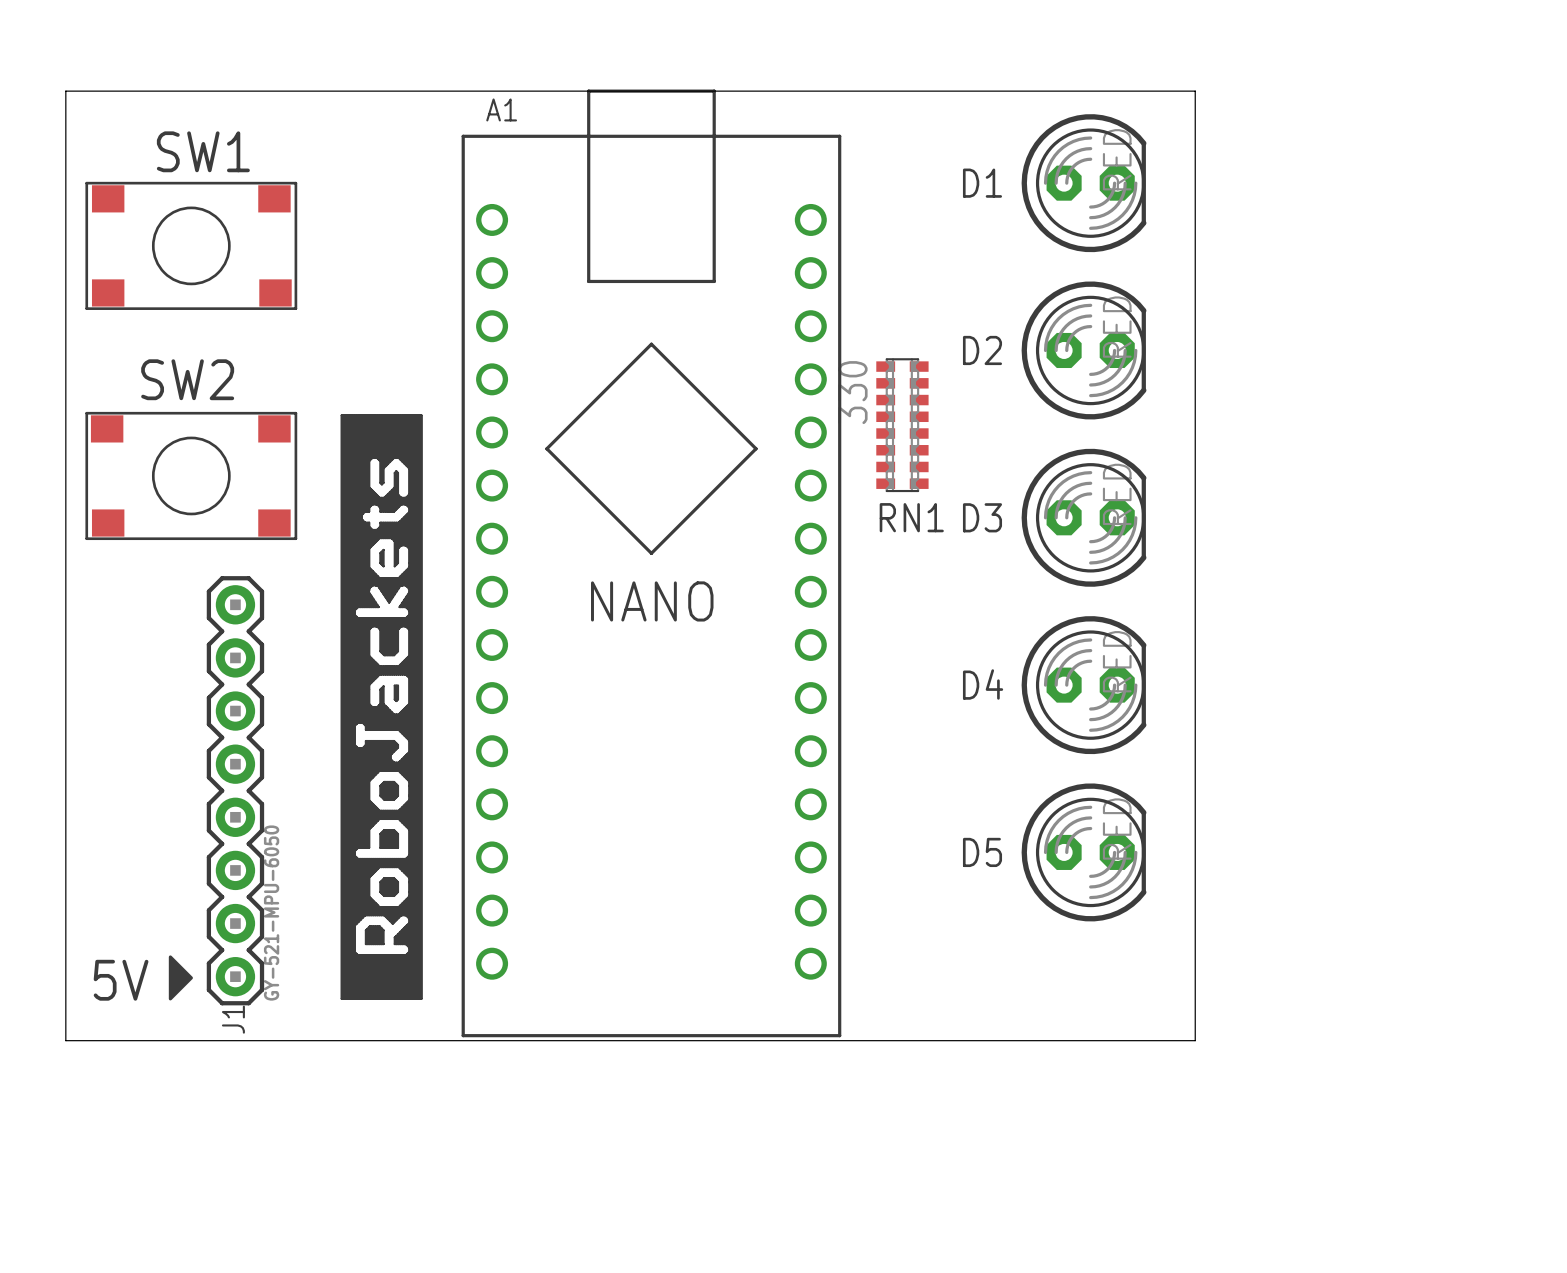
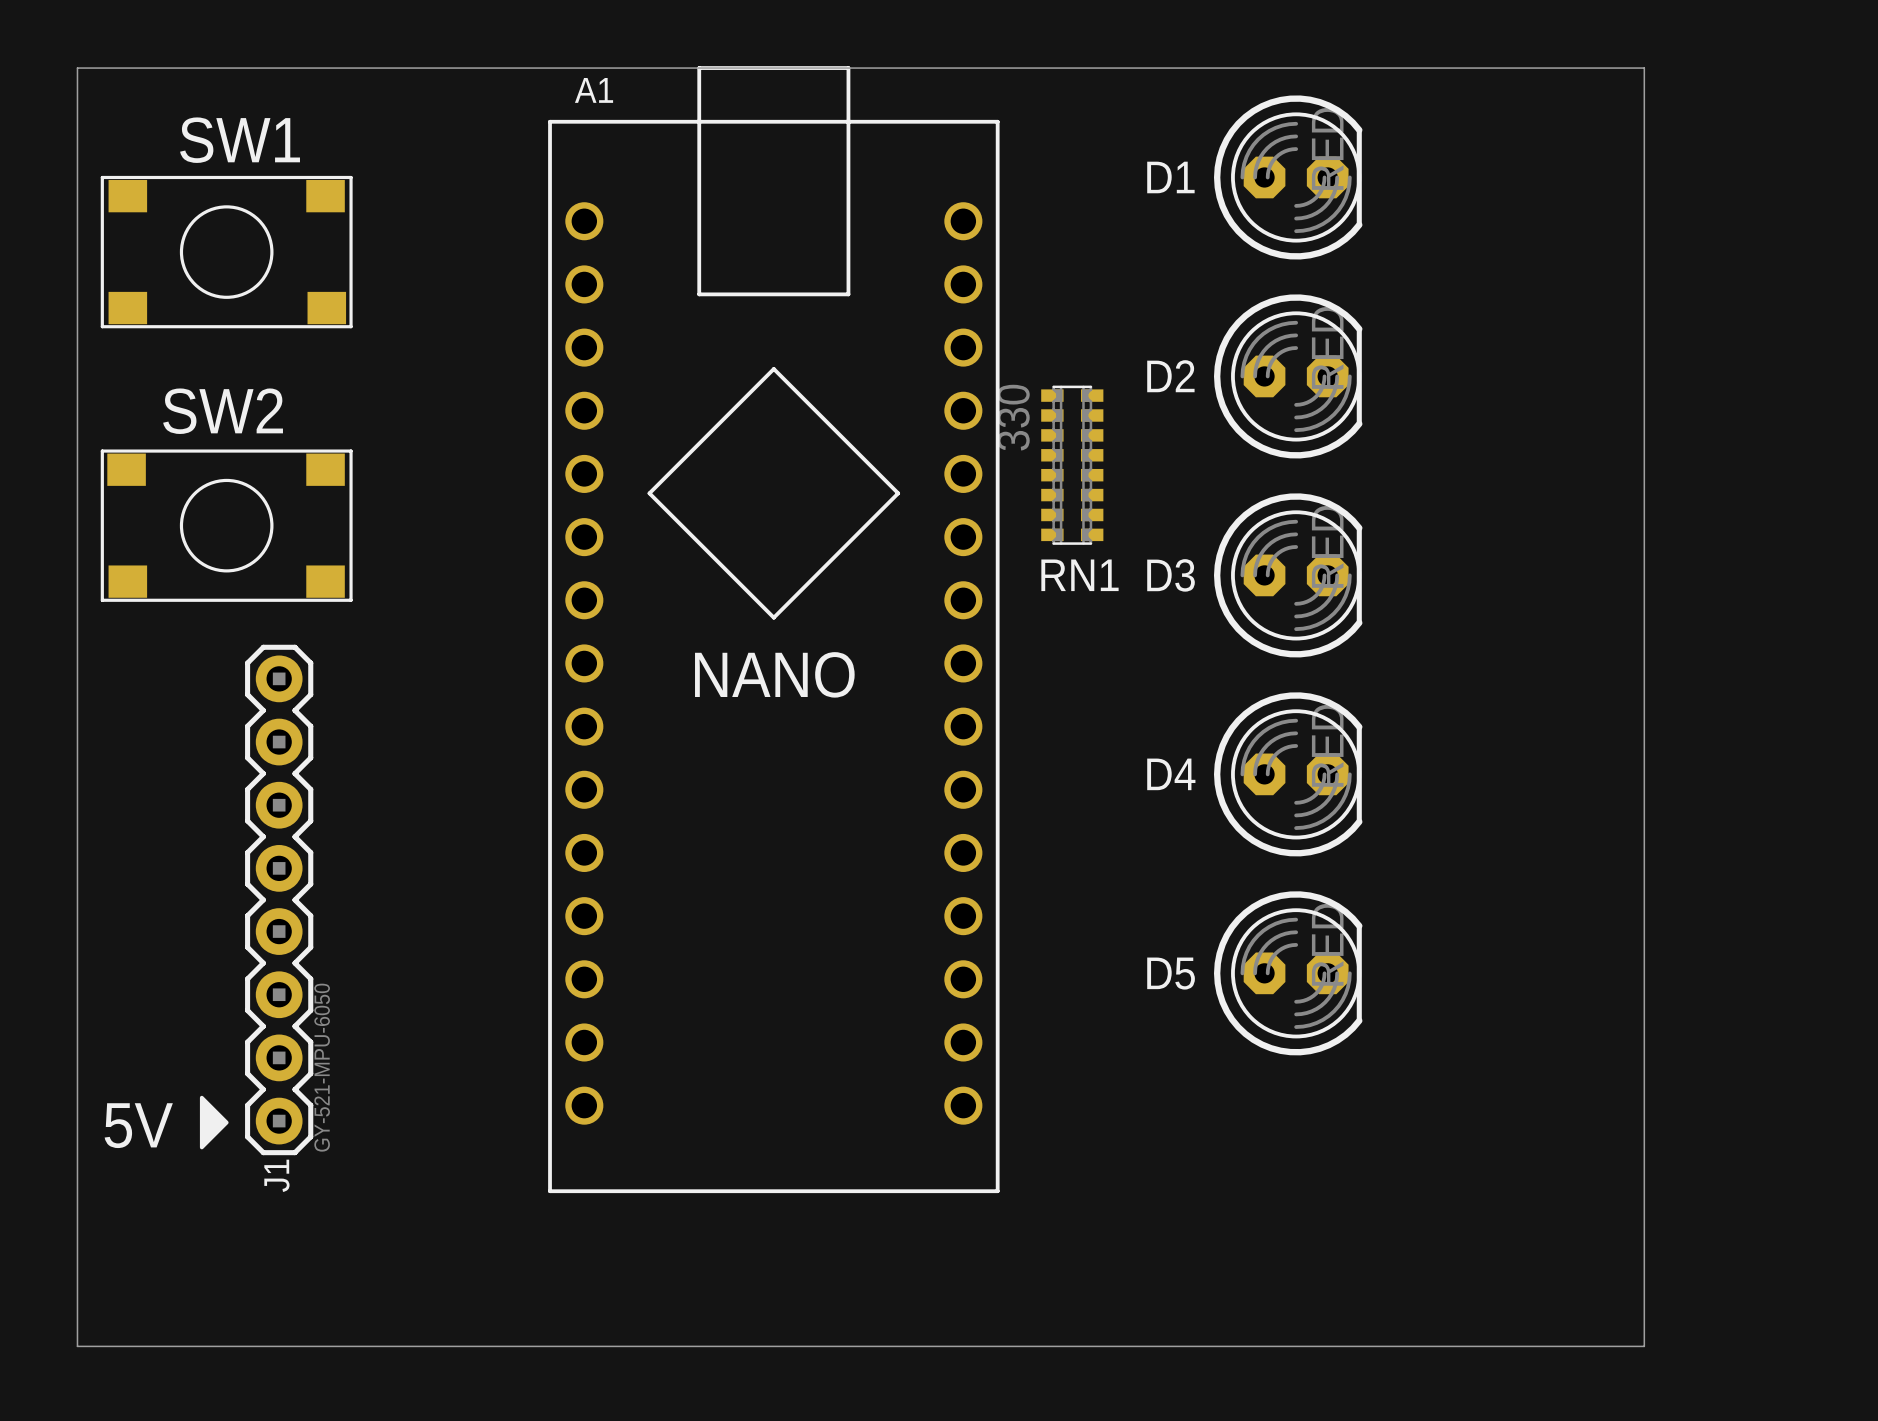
board edge: (1195, 91) (1195, 1040) (65, 1040) -> (1420, 68) (1644, 68) (1644, 1346) (77, 1346) (77, 1197)
drawing: [340, 414, 423, 1000] -> none

